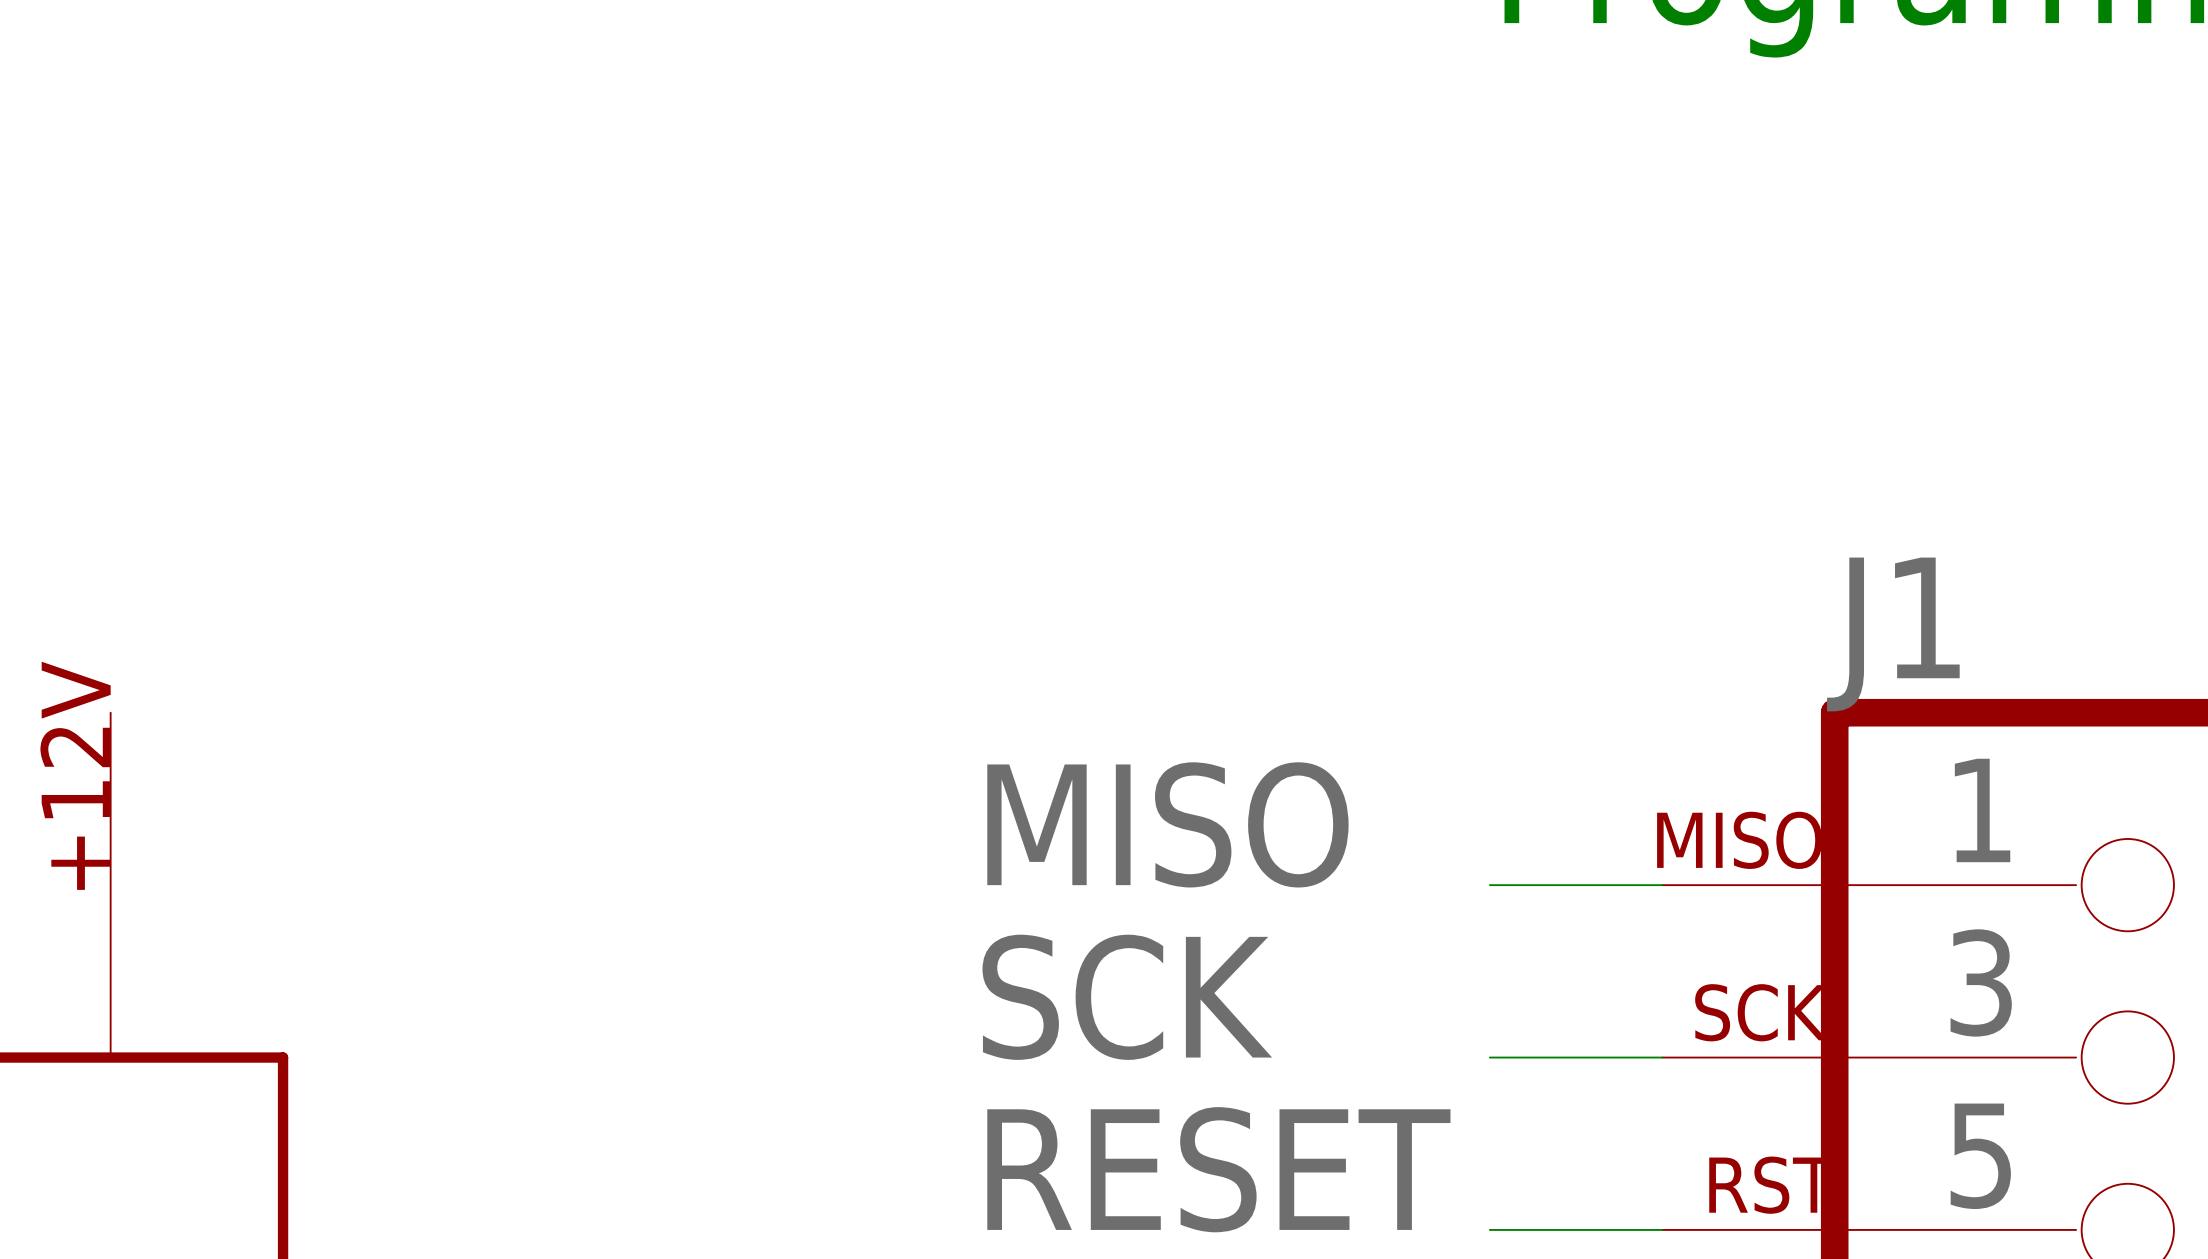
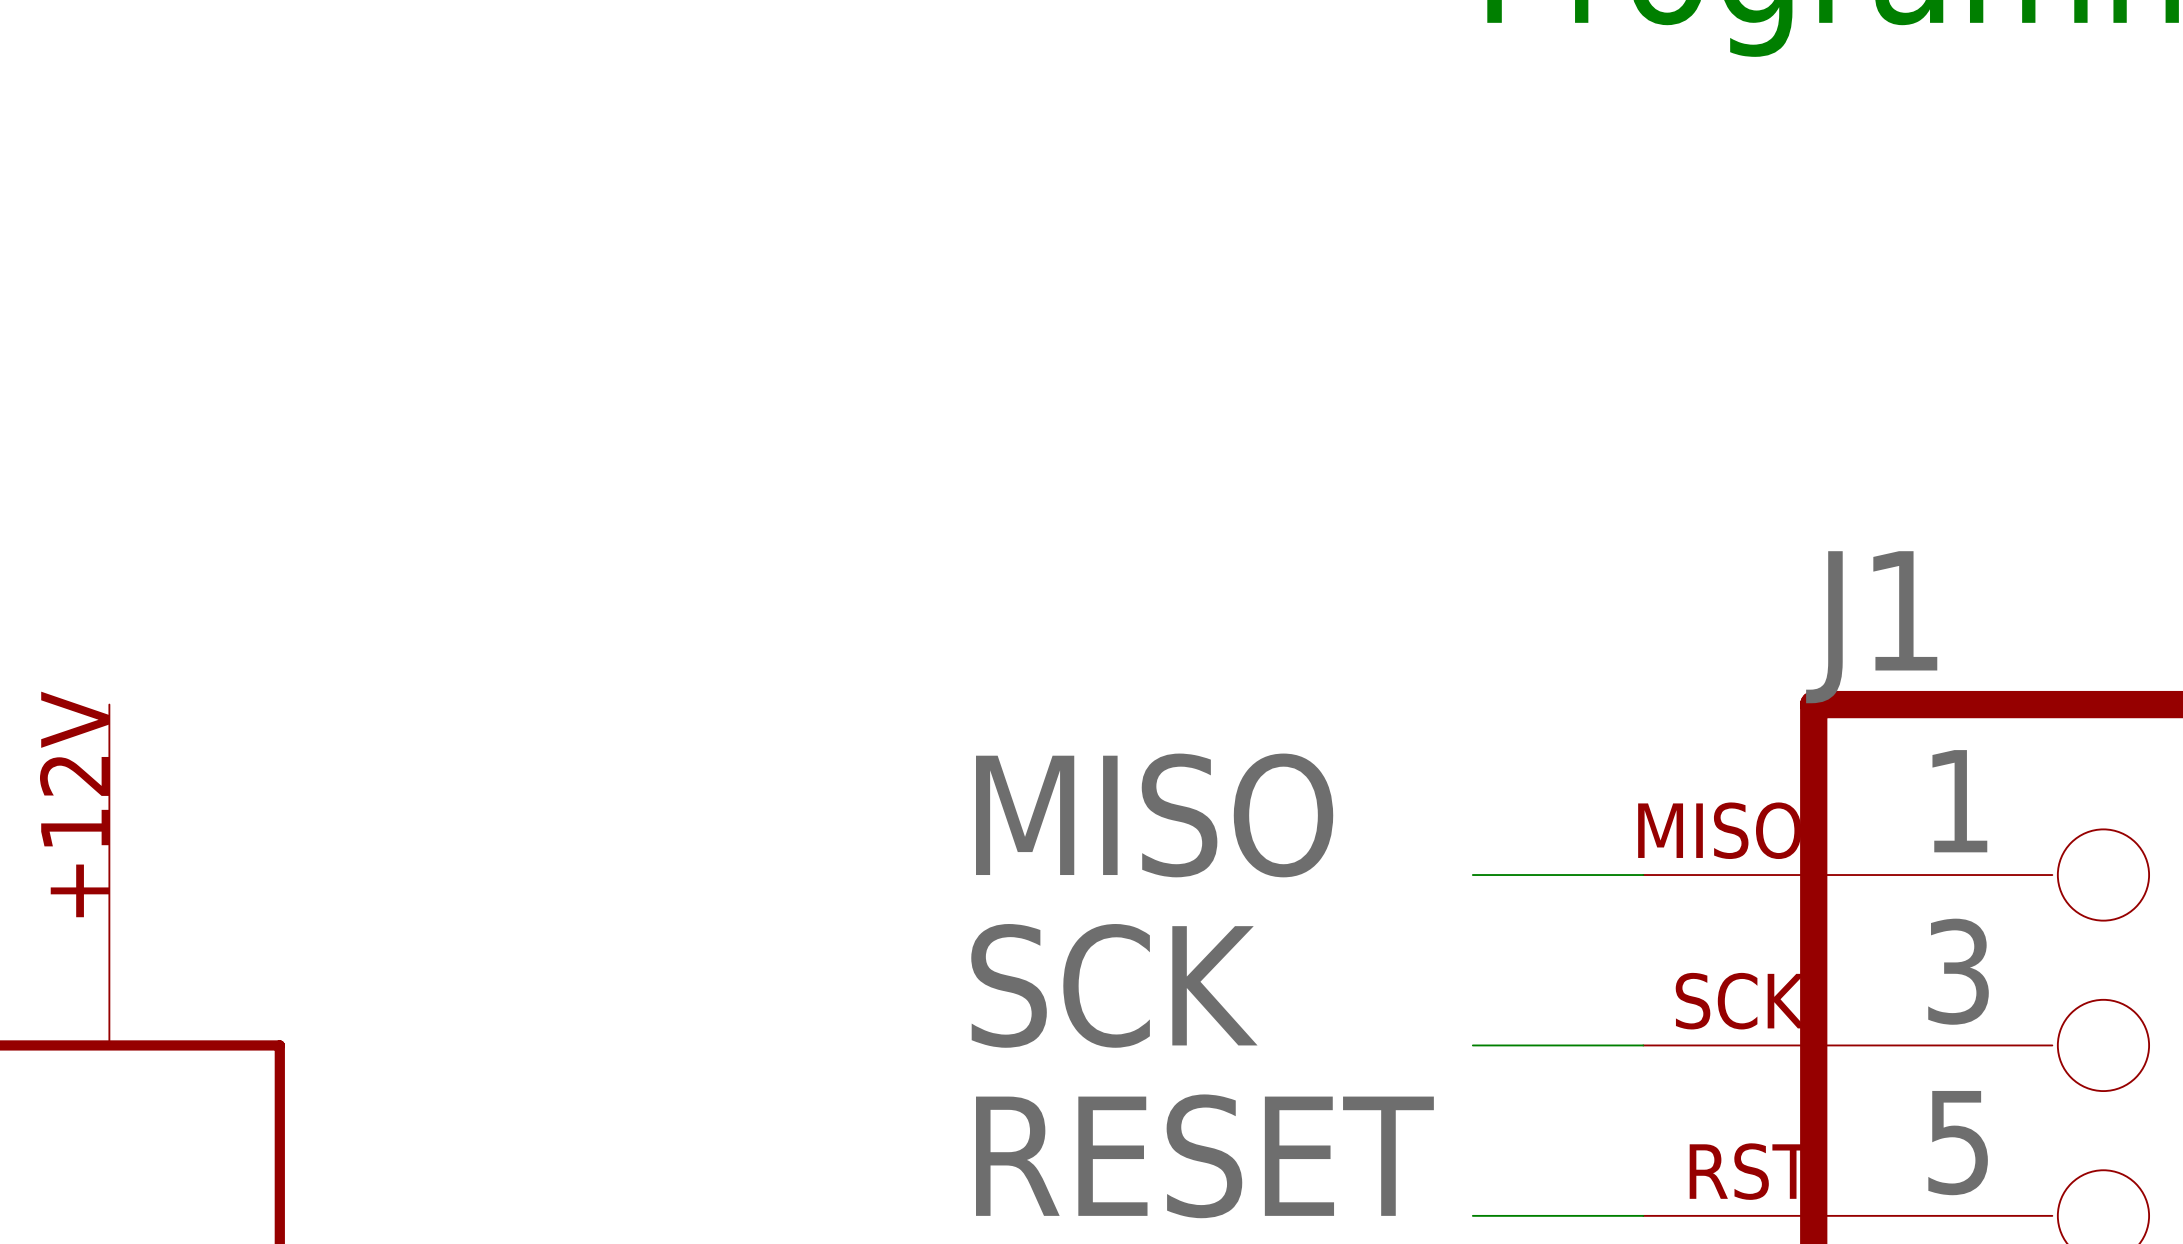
part text position: +12V (75, 775) -> +12V (74, 804)

